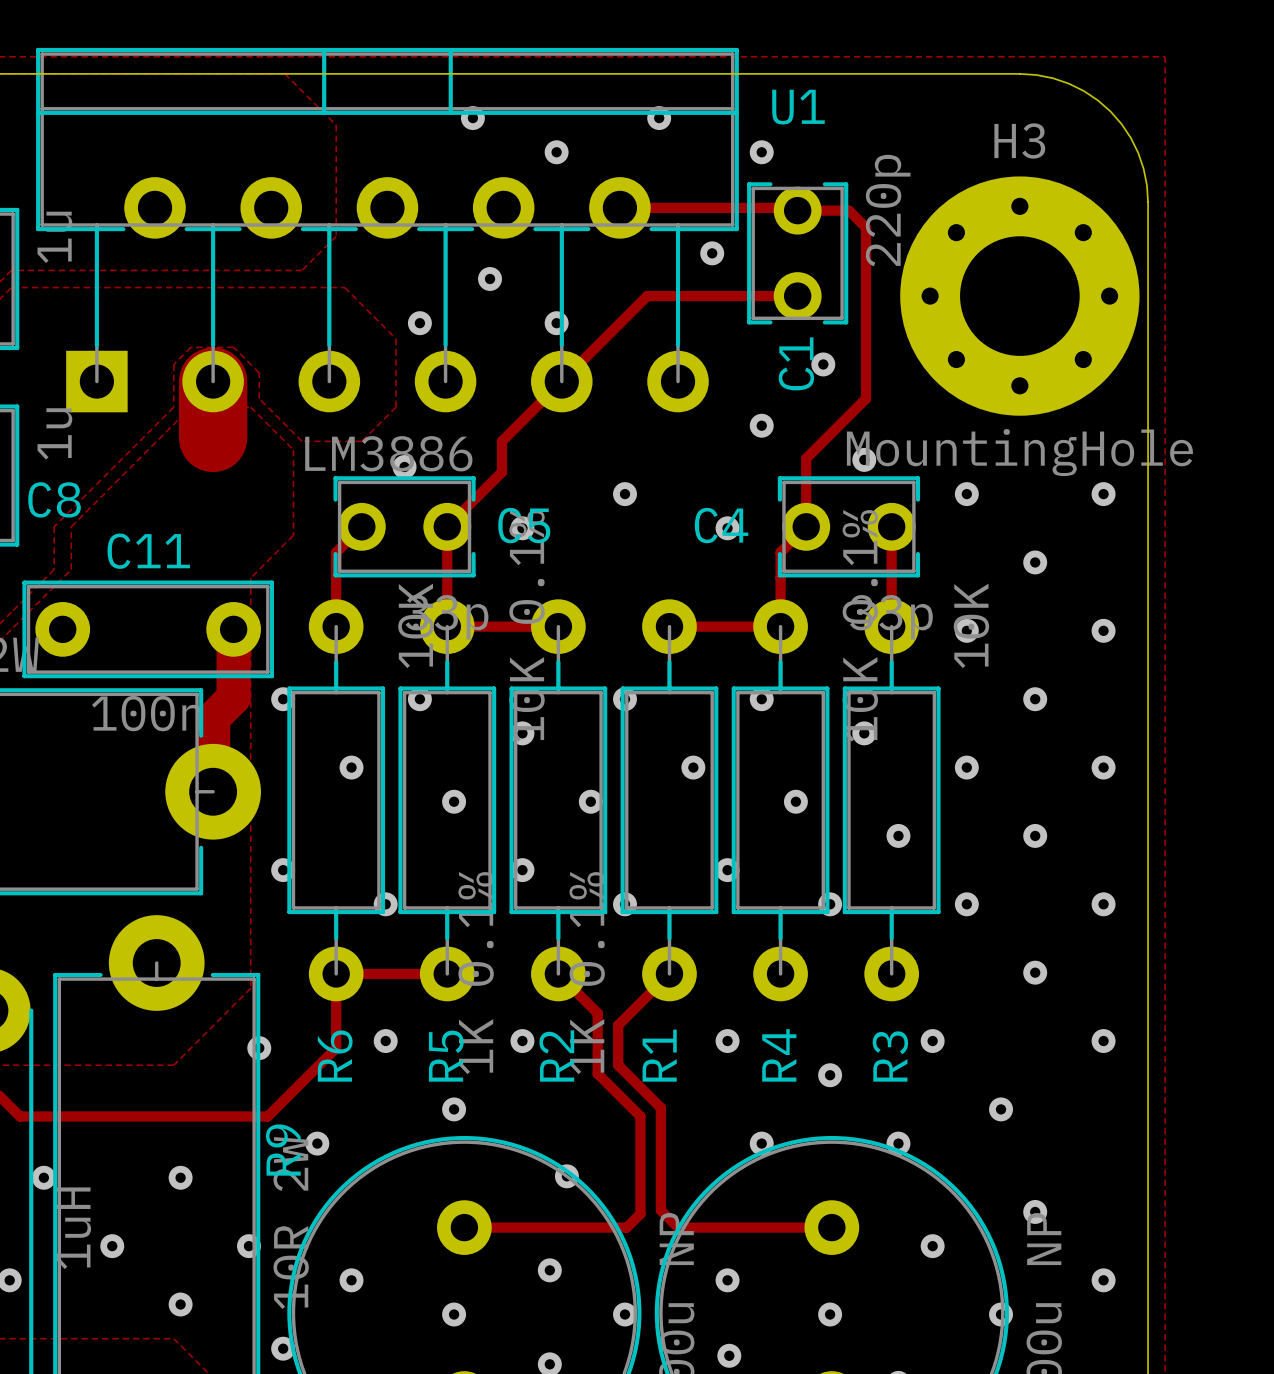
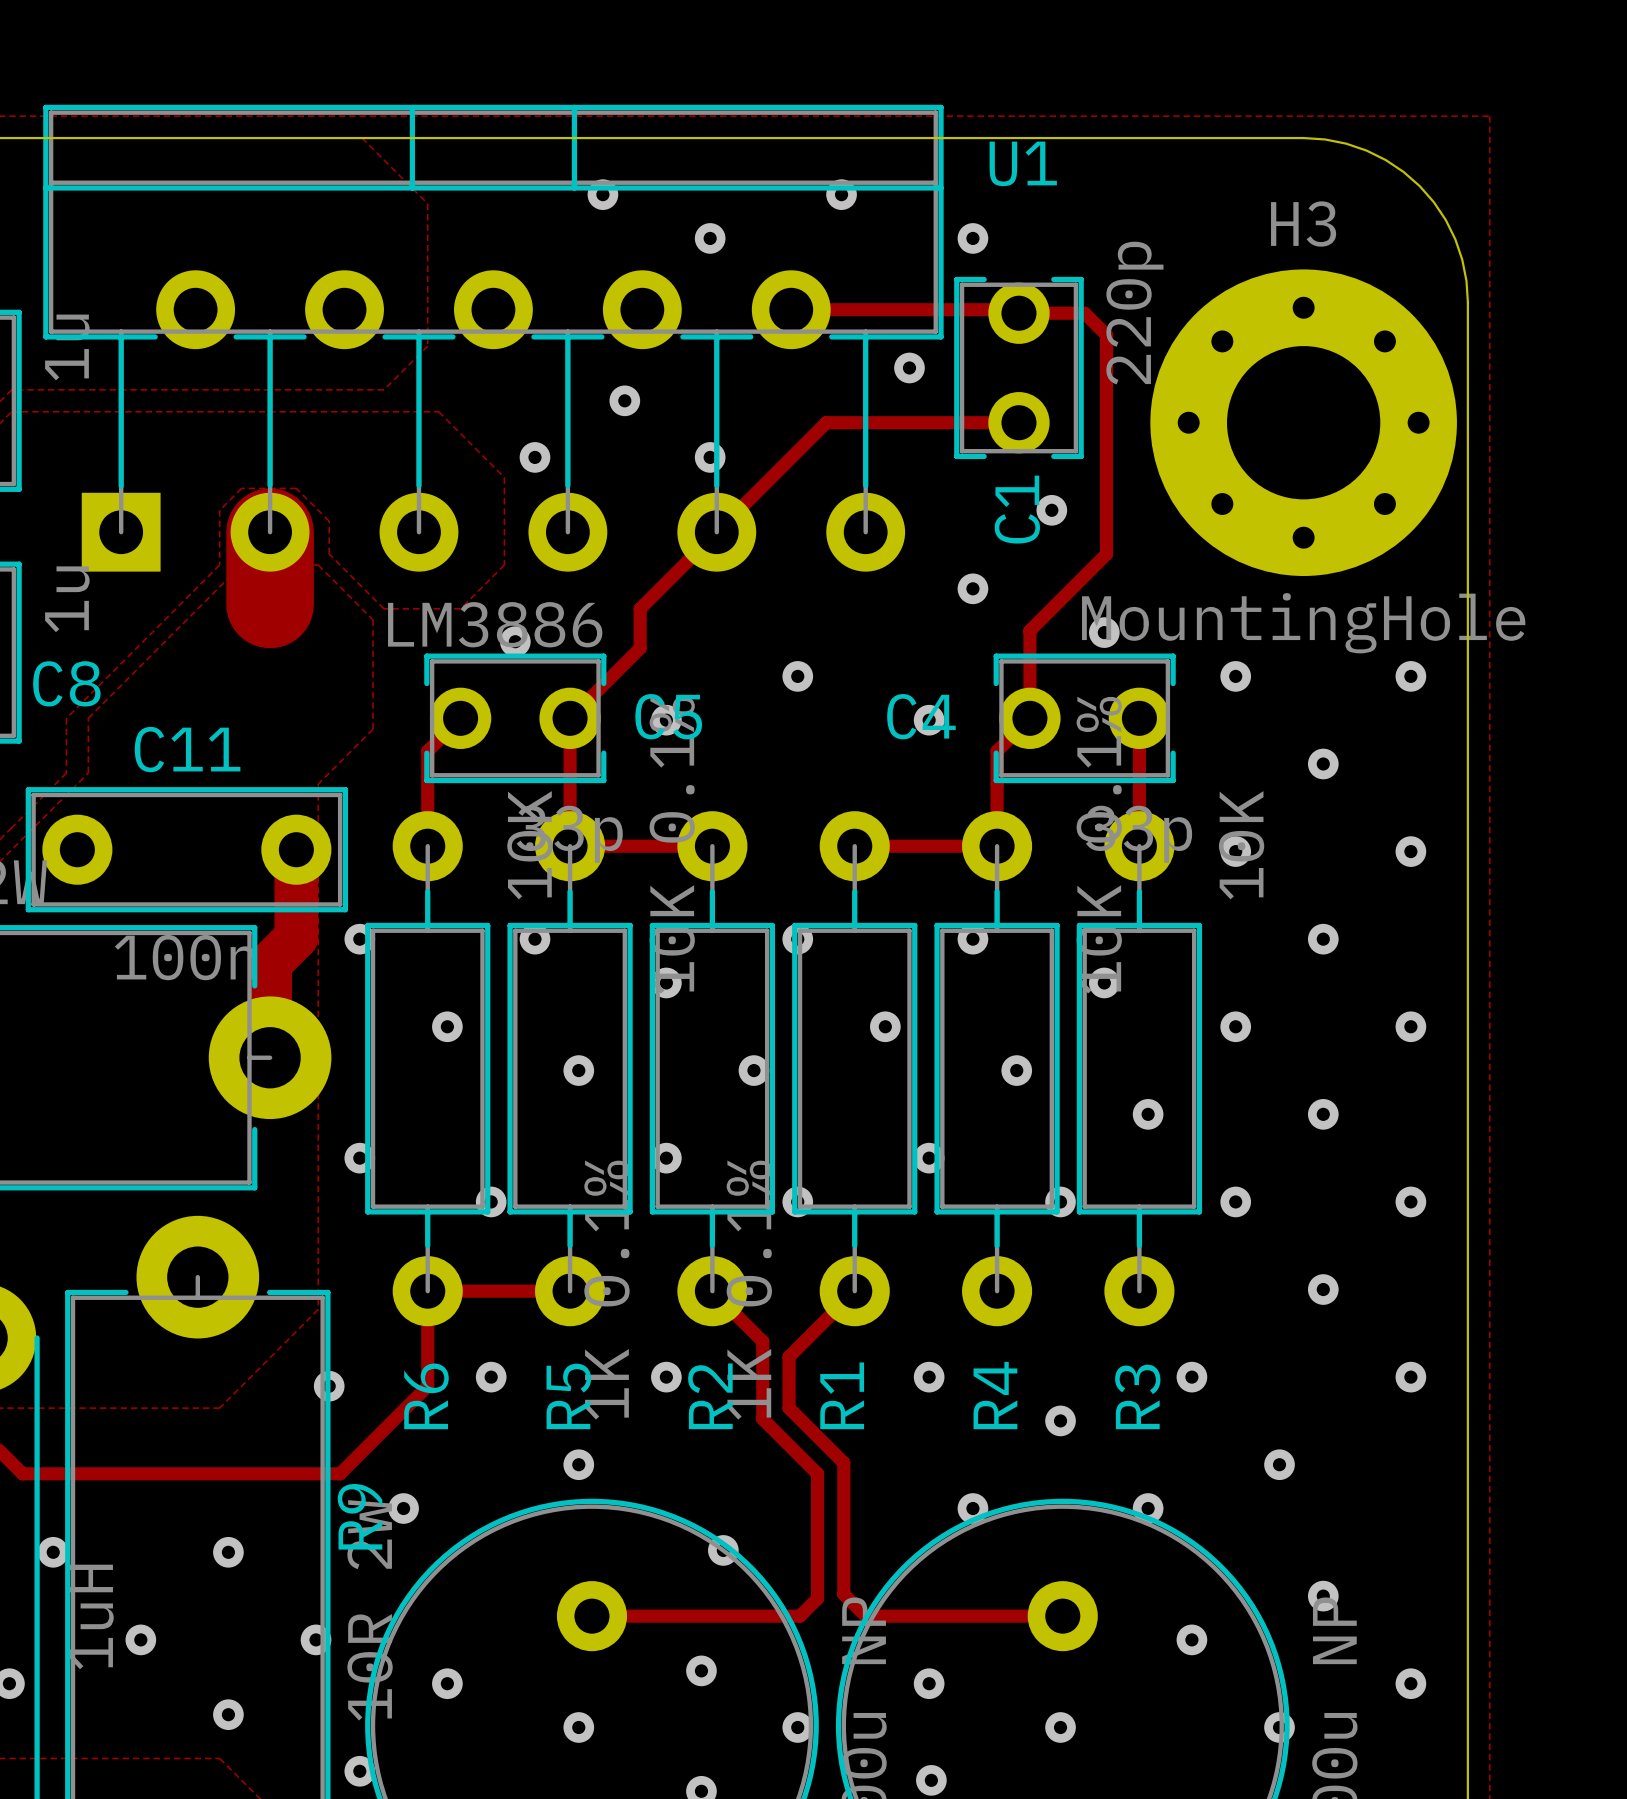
U1 name position: U1 (798, 107) -> U1 (1023, 163)

